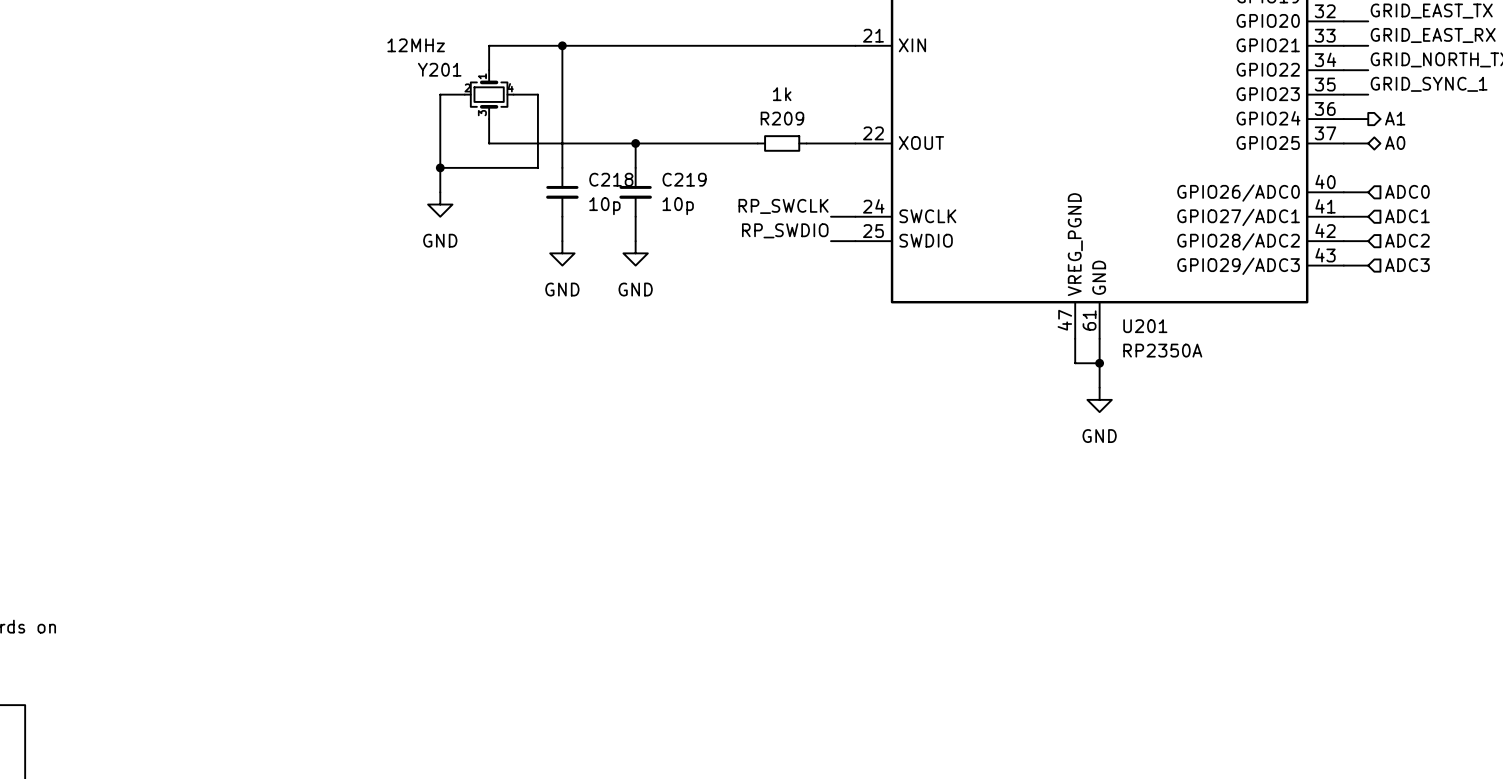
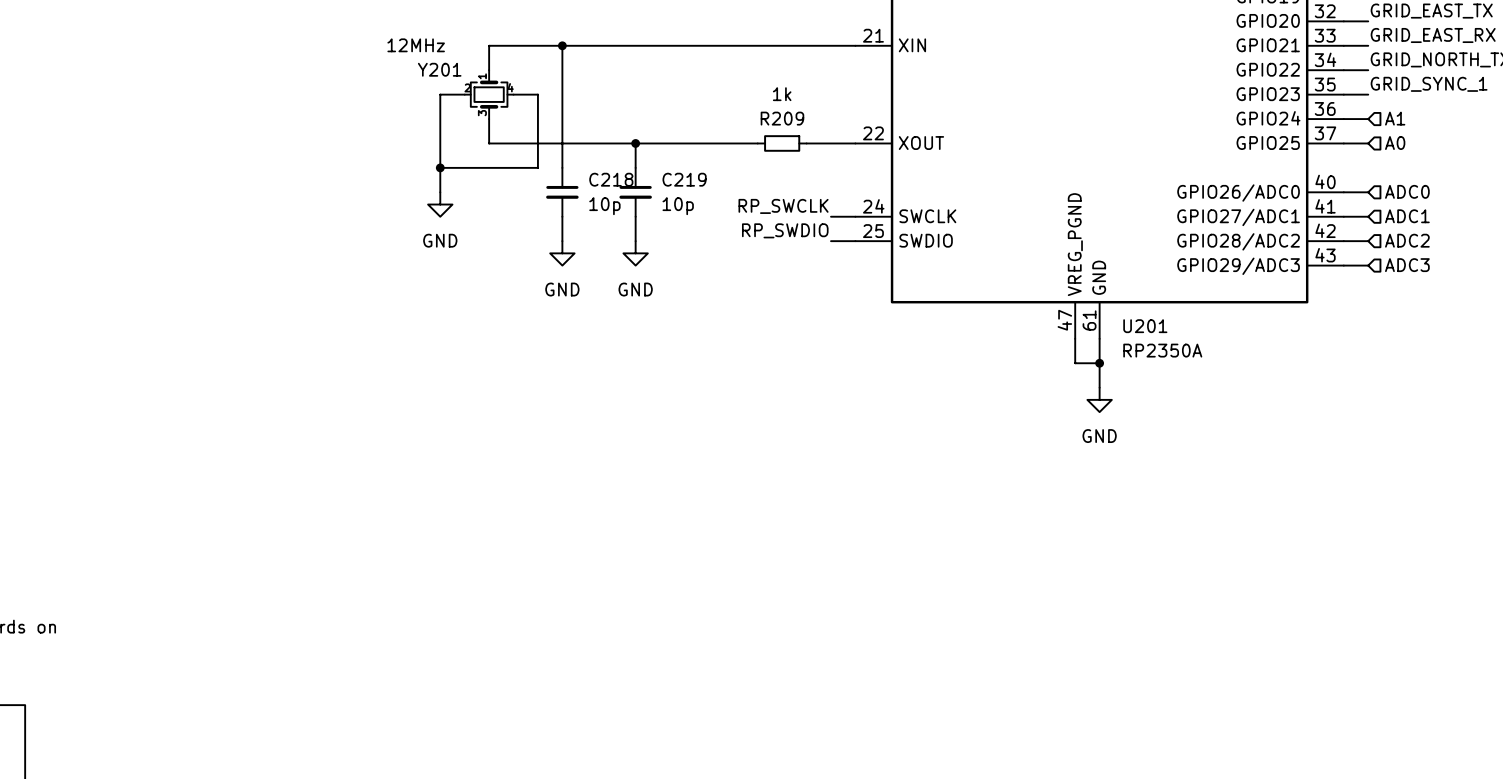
hierarchical label shape: output (1395, 118) -> input (1395, 118)
hierarchical label shape: bidirectional (1395, 143) -> input (1395, 143)

